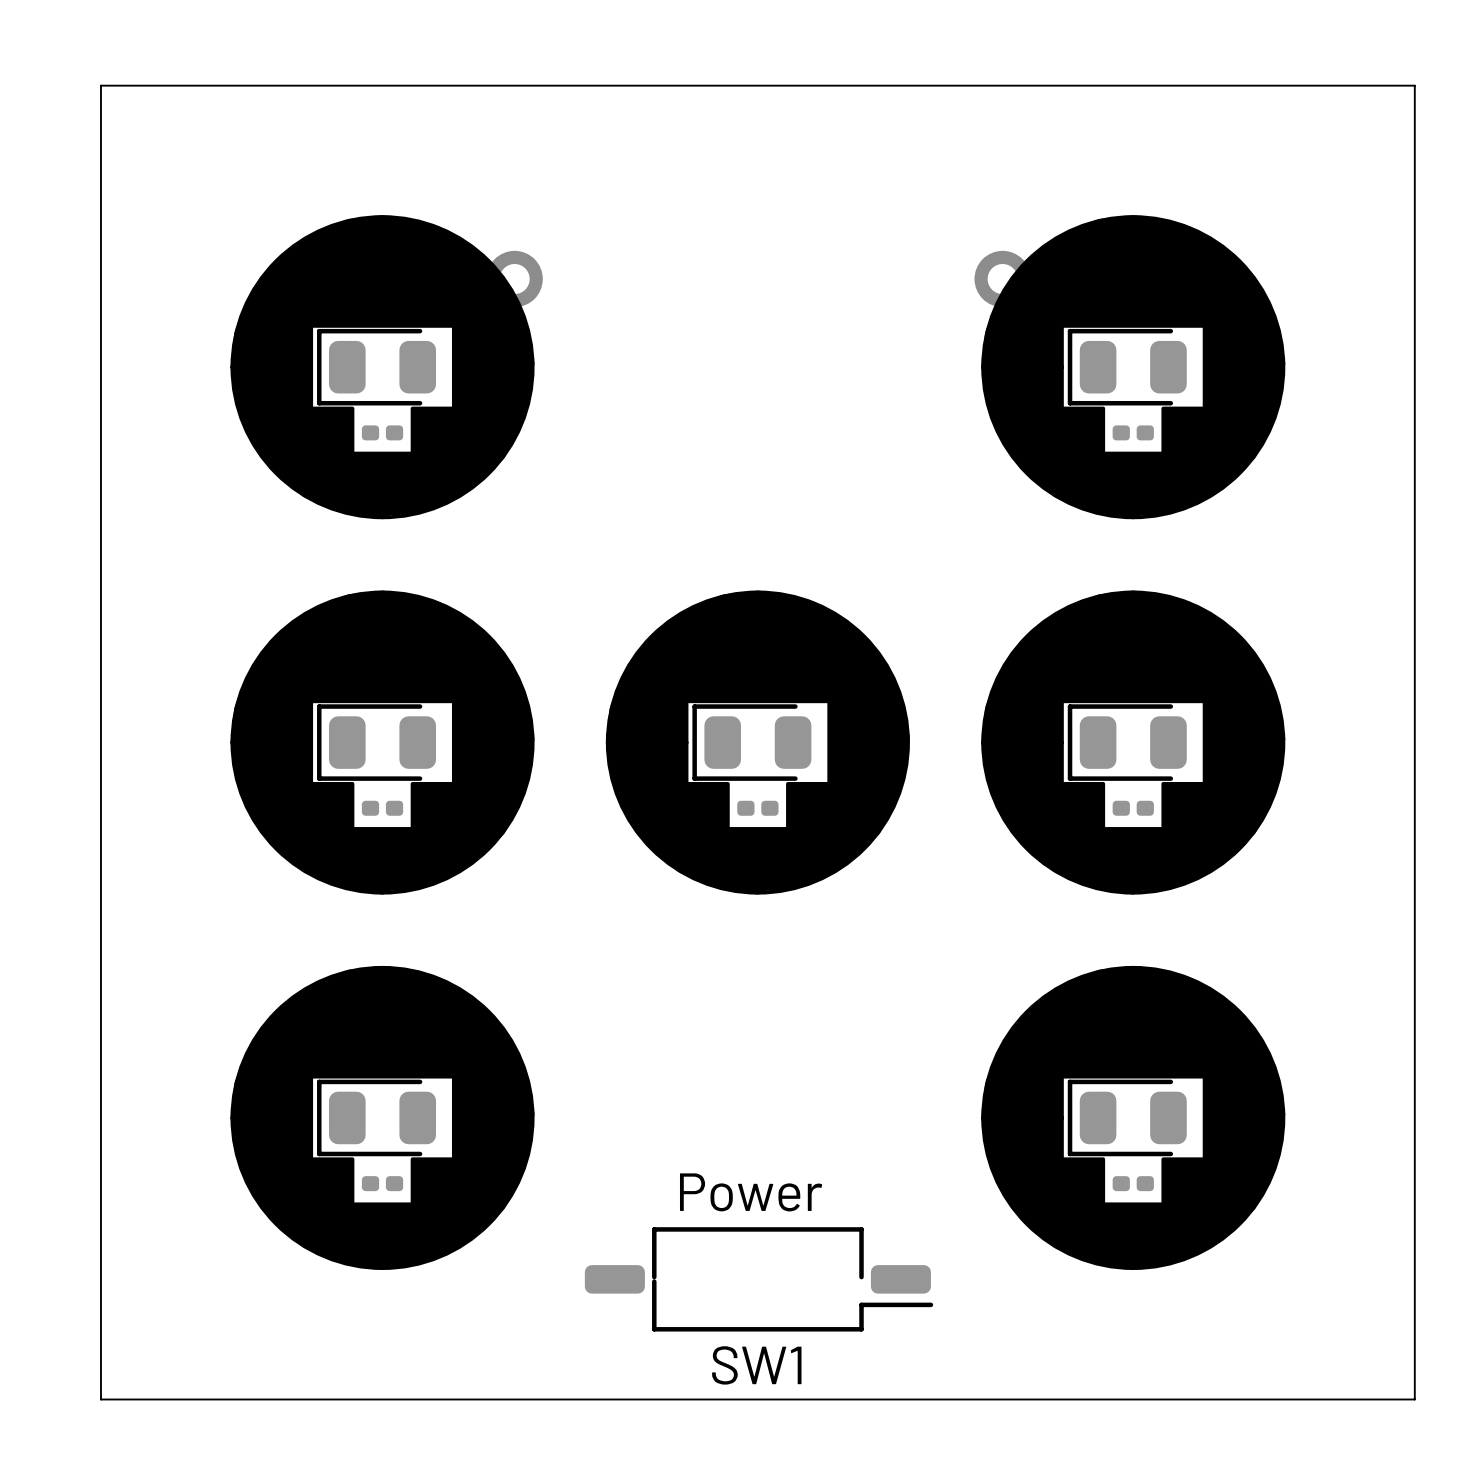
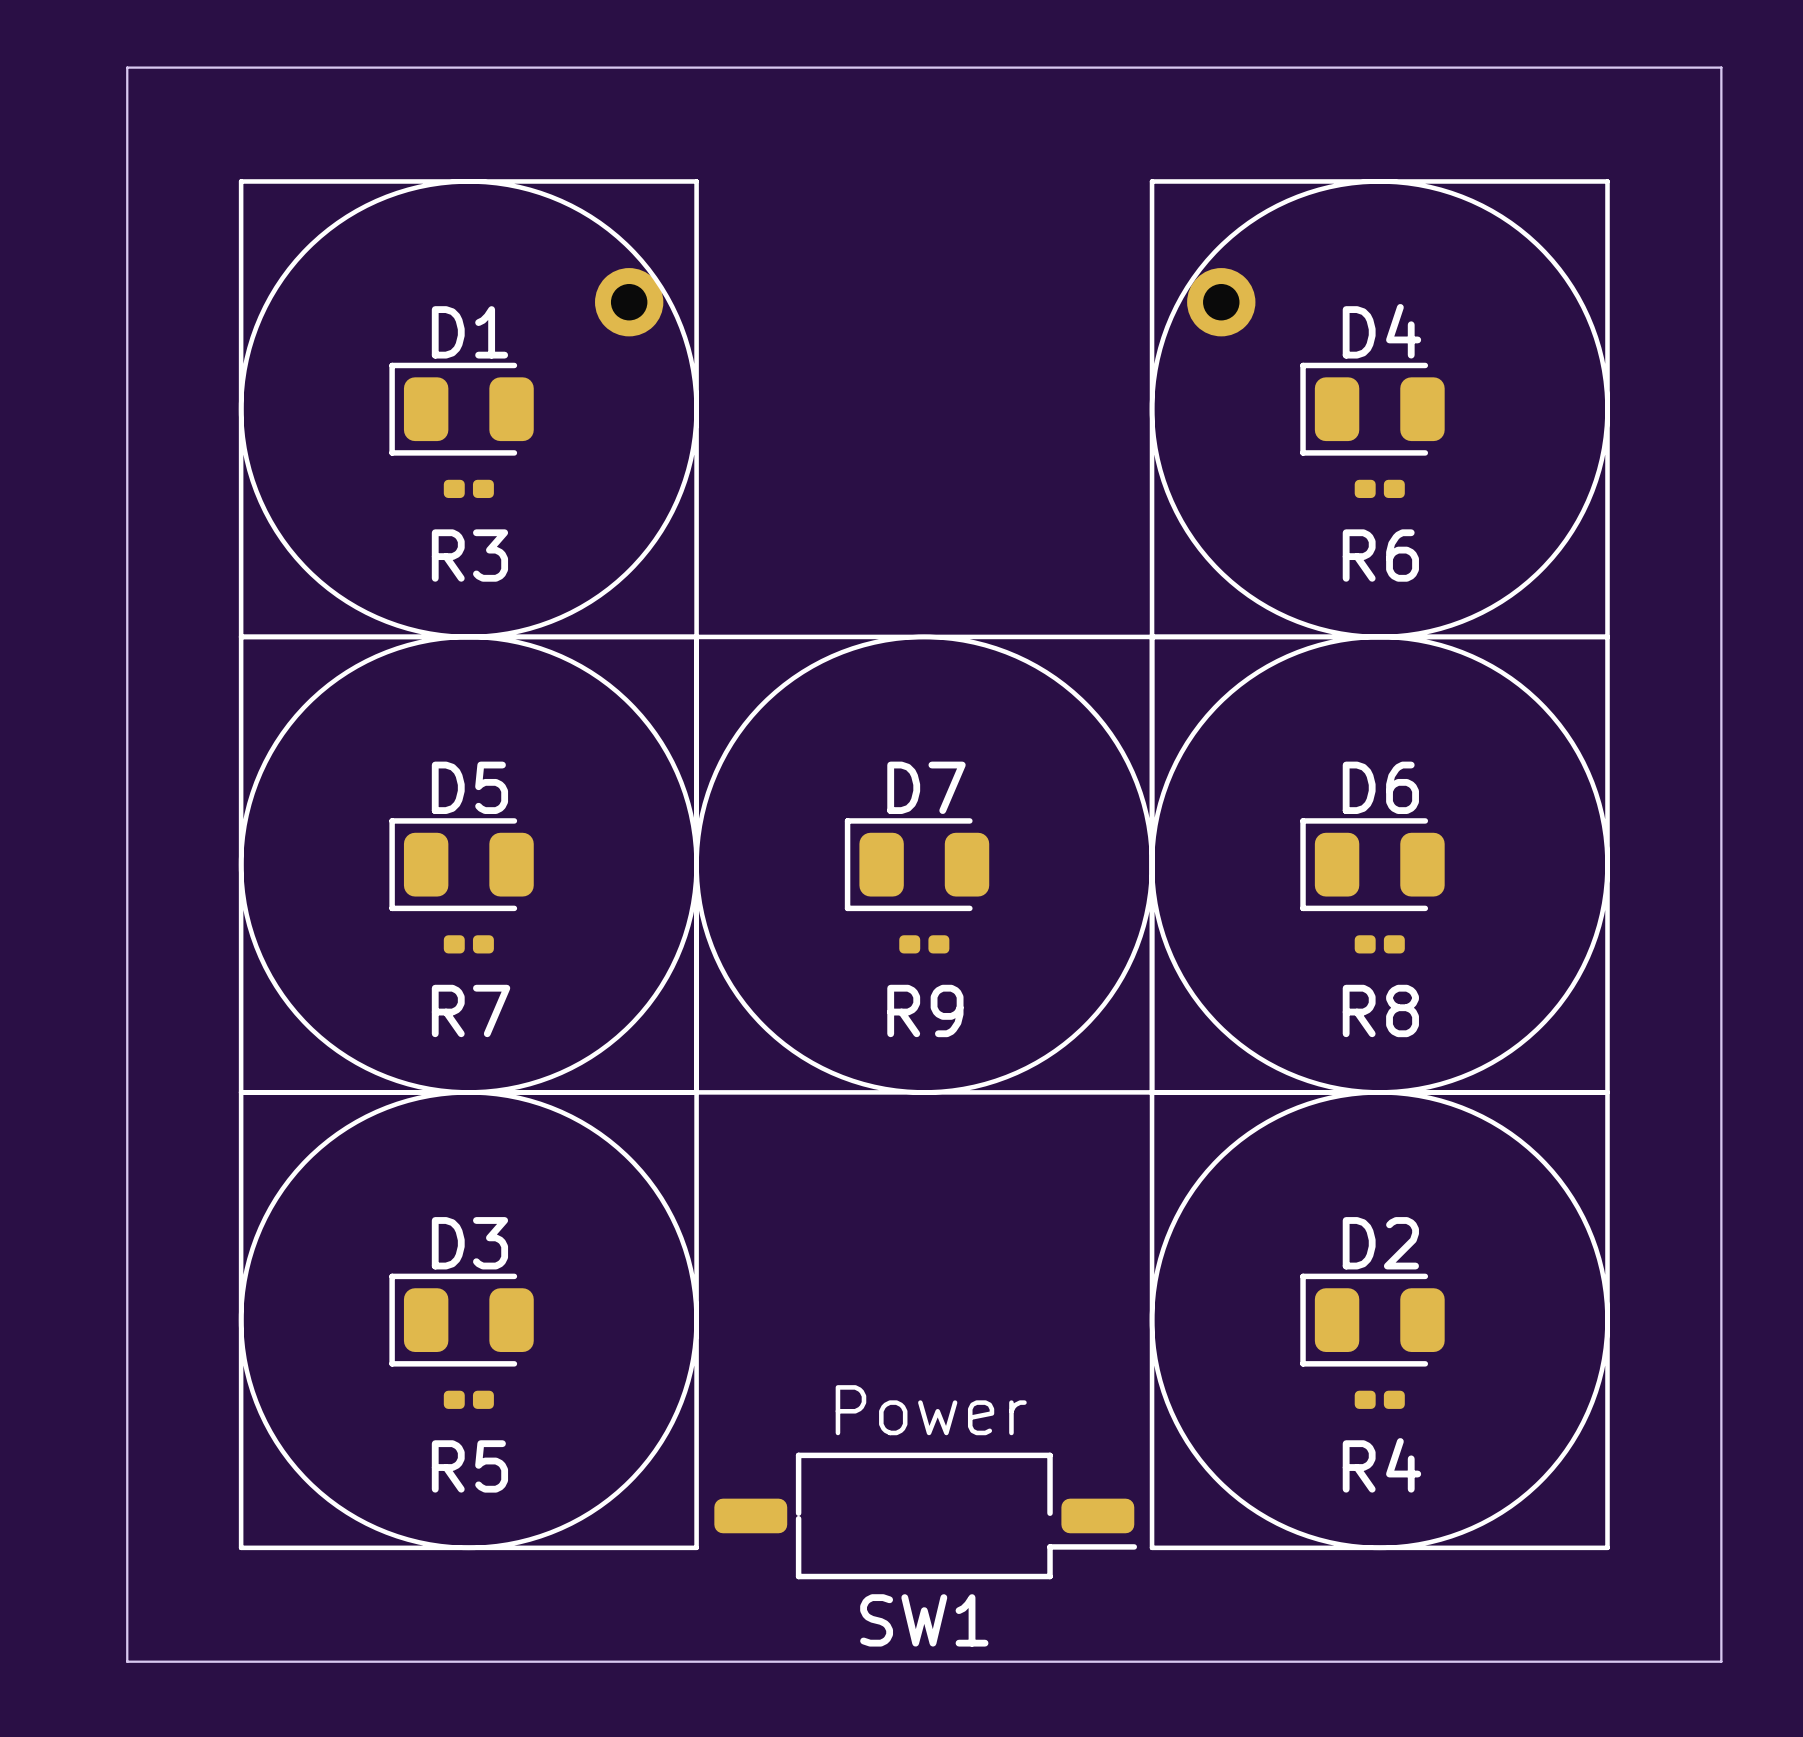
drawing: none -> [238, 179, 1610, 1551]
line: none -> (241, 181) (696, 181) (696, 1547) (241, 1547) (241, 181)
line: none -> (1152, 181) (1152, 1547) (1607, 1547) (1607, 181) (1152, 181)
drawing: [230, 215, 535, 520] -> none
drawing: [981, 215, 1286, 520] -> none
D1 name: none -> D1 (469, 332)
D4 name: none -> D4 (1381, 331)
R6 name: none -> R6 (1380, 555)
R3 name: none -> R3 (469, 555)
line: none -> (241, 636) (1607, 636)
drawing: [230, 590, 535, 895] -> none
drawing: [605, 590, 910, 895] -> none
drawing: [981, 590, 1286, 895] -> none
D5 name: none -> D5 (469, 787)
D7 name: none -> D7 (926, 787)
D6 name: none -> D6 (1380, 787)
R7 name: none -> R7 (471, 1010)
R9 name: none -> R9 (925, 1010)
R8 name: none -> R8 (1380, 1010)
line: none -> (241, 1092) (1607, 1092)
drawing: [230, 965, 535, 1270] -> none
drawing: [981, 965, 1286, 1270] -> none
D3 name: none -> D3 (469, 1243)
D2 name: none -> D2 (1380, 1243)
R5 name: none -> R5 (469, 1466)
R4 name: none -> R4 (1381, 1465)

